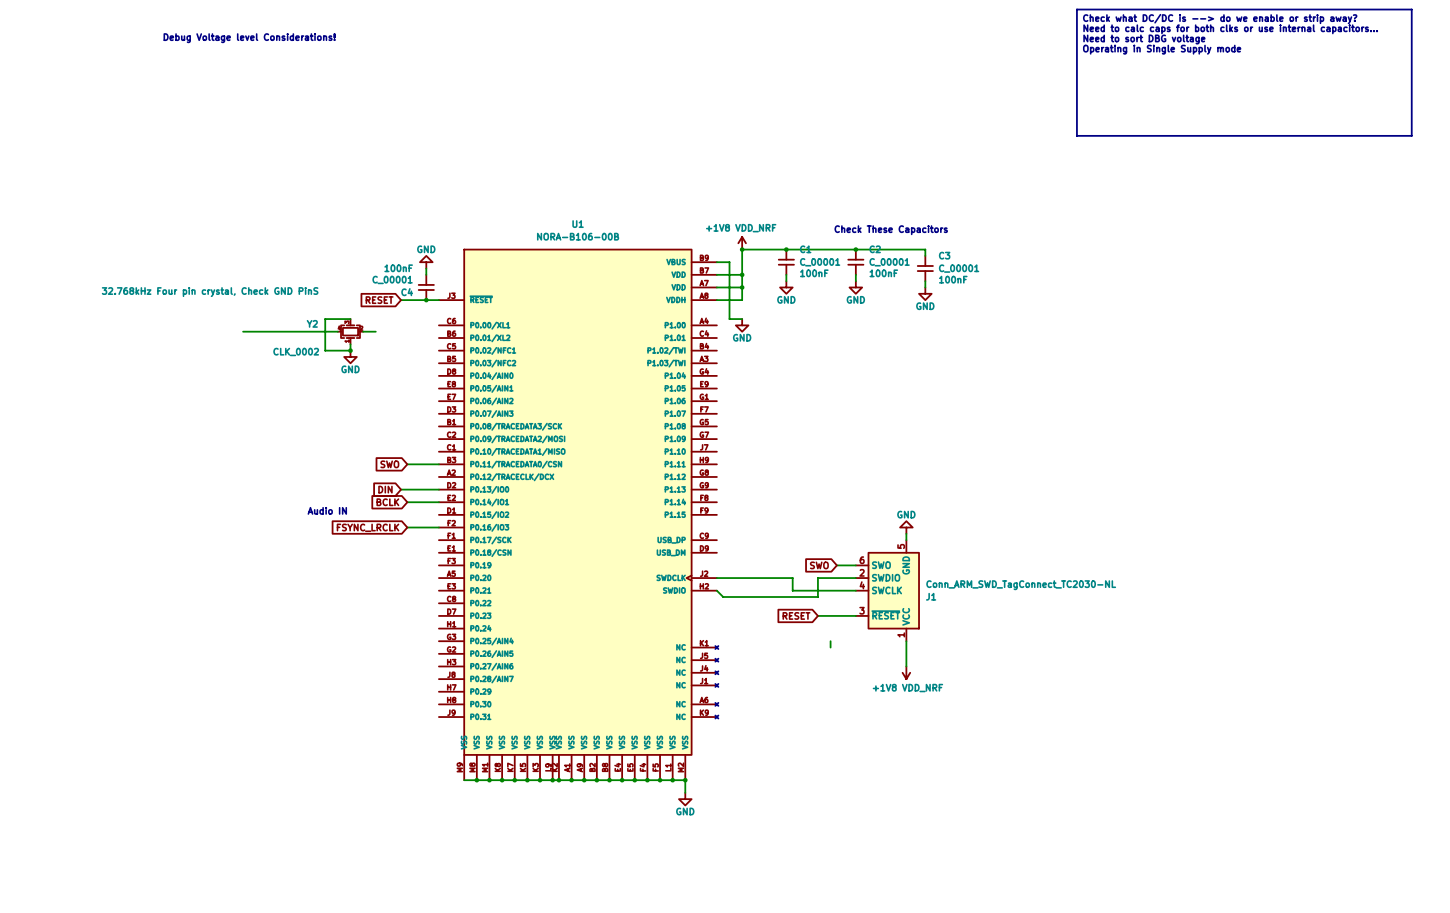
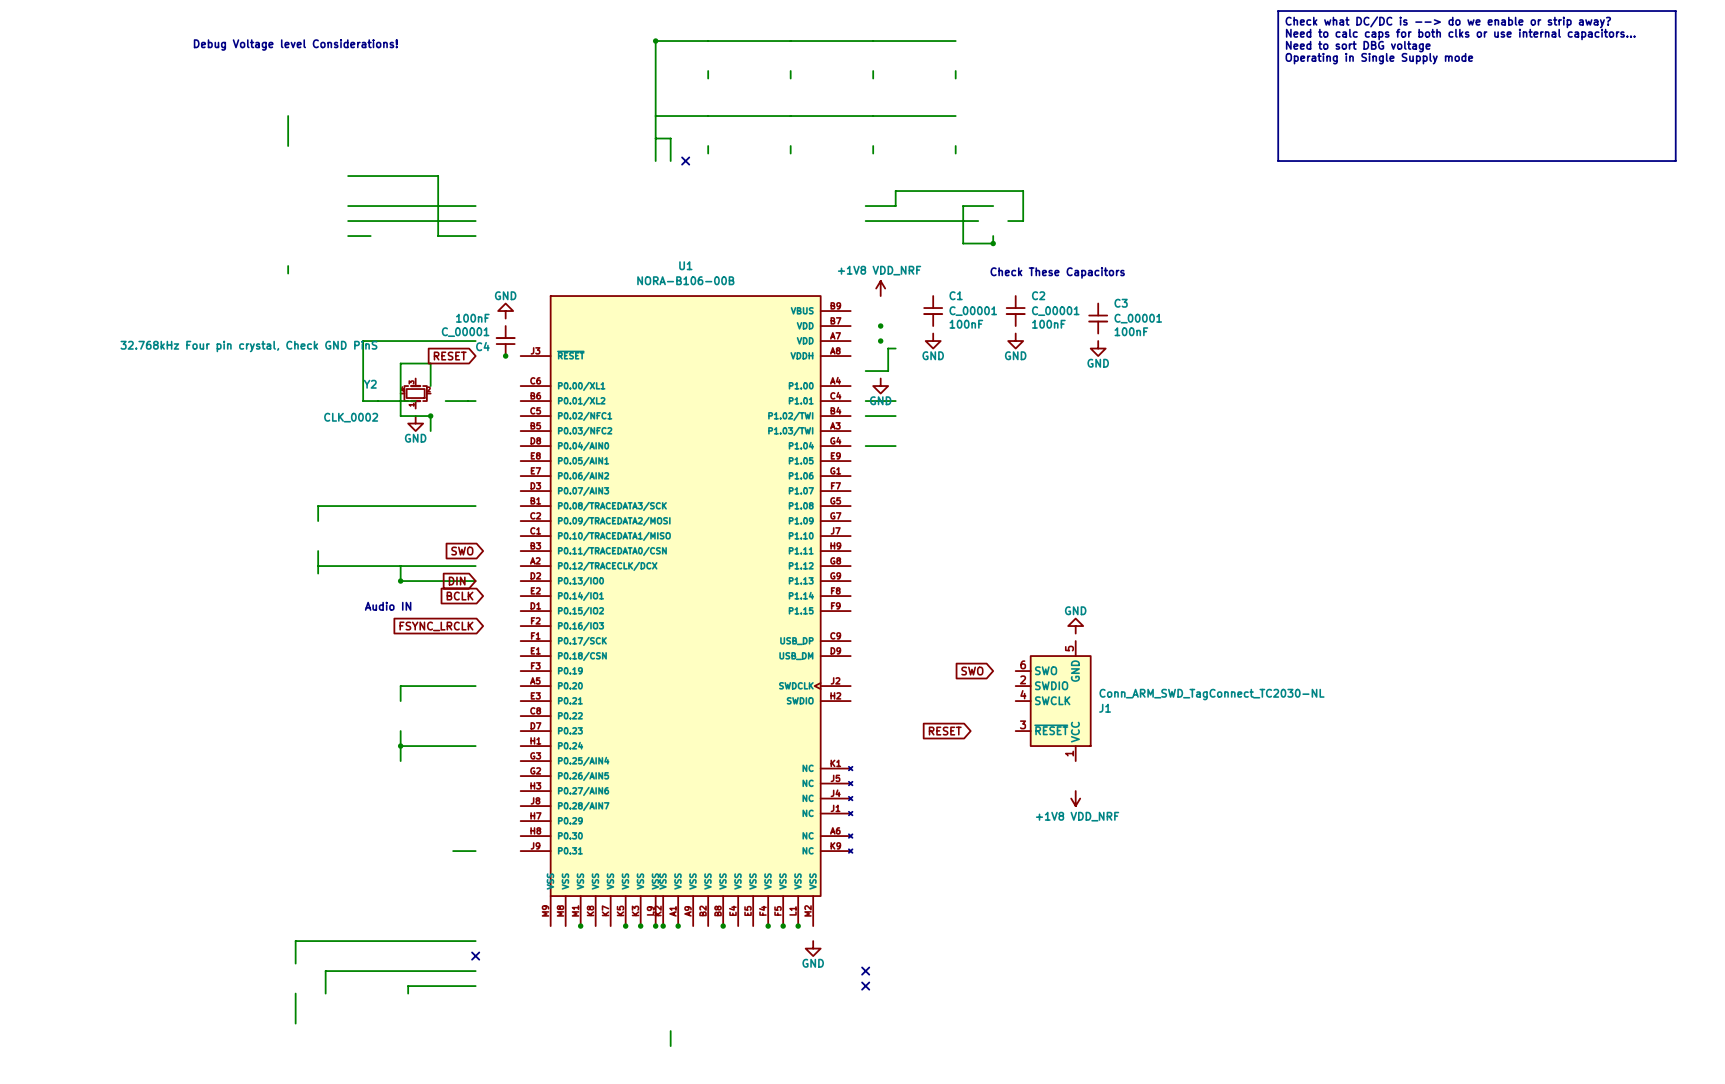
junction: none -> (655, 41)
wire: none -> (955, 41) (655, 41) (655, 161)
wire: none -> (708, 71) (708, 78)
wire: none -> (790, 71) (790, 78)
wire: none -> (873, 71) (873, 78)
wire: none -> (955, 71) (955, 78)
wire: none -> (288, 116) (288, 146)
wire: none -> (655, 116) (955, 116)
wire: none -> (655, 138) (670, 138) (670, 161)
wire: none -> (708, 146) (708, 153)
wire: none -> (790, 146) (790, 153)
wire: none -> (873, 146) (873, 153)
wire: none -> (955, 146) (955, 153)
no-connect mark: none -> (685, 161)
wire: none -> (348, 176) (438, 176) (438, 236) (475, 236)
wire: none -> (348, 206) (475, 206)
wire: none -> (865, 206) (895, 206) (895, 191) (1023, 191) (1023, 221) (1008, 221)
wire: none -> (993, 206) (963, 206) (963, 243) (993, 243) (993, 236)
wire: none -> (348, 221) (475, 221)
wire: none -> (865, 221) (978, 221)
wire: none -> (348, 236) (370, 236)
junction: none -> (993, 243)
wire: none -> (288, 266) (288, 273)
junction: (742, 249) -> none
junction: (786, 249) -> none
junction: (855, 249) -> none
wire: (925, 255) (925, 249) (742, 249) (742, 300) (716, 300) -> none
wire: (716, 262) (729, 262) (729, 319) (742, 319) -> none
wire: (426, 268) (426, 274) -> none
wire: (716, 274) (742, 274) -> (865, 401) (895, 401)
wire: (786, 274) (786, 281) -> none
wire: (855, 274) (855, 281) -> none
wire: (925, 281) (925, 287) -> none
wire: none -> (475, 341) (363, 341) (363, 401) (415, 401)
wire: (716, 287) (742, 287) -> (865, 416) (895, 416)
wire: none -> (895, 348) (888, 348) (888, 371) (865, 371)
wire: (401, 300) (438, 300) -> none
wire: (350, 319) (325, 319) (325, 350) (337, 350) -> (430, 386) (430, 363) (400, 363) (400, 416)
wire: (243, 331) (337, 331) -> none
wire: (363, 331) (375, 331) -> none
wire: none -> (445, 401) (475, 401)
wire: (350, 344) (350, 350) -> (430, 431) (430, 416) (415, 416)
junction position: (350, 350) -> (430, 416)
wire: none -> (865, 446) (895, 446)
wire: none -> (475, 506) (318, 506) (318, 521)
wire: none -> (318, 551) (318, 573)
wire: (407, 464) (438, 464) -> none
wire: none -> (318, 566) (475, 566)
junction: none -> (400, 581)
wire: (401, 489) (438, 489) -> (475, 581) (400, 581) (400, 566)
wire: (407, 502) (438, 502) -> none
wire: (407, 527) (438, 527) -> none
wire: (906, 533) (906, 540) -> none
wire: (836, 565) (855, 565) -> none
wire: none -> (475, 686) (400, 686) (400, 701)
wire: (716, 578) (792, 578) (792, 590) (855, 590) -> none
wire: (855, 578) (817, 578) (817, 597) (723, 597) (716, 590) -> none
wire: none -> (400, 731) (400, 761)
wire: (817, 615) (855, 615) -> none
wire: none -> (400, 746) (475, 746)
junction: none -> (400, 746)
wire: (830, 641) (830, 647) -> none
wire: (906, 641) (906, 666) -> none
wire: none -> (453, 851) (475, 851)
wire: (464, 780) (685, 780) (685, 792) -> none
junction: (476, 780) -> none
junction: (502, 780) -> none
junction: (514, 780) -> none
junction: (584, 780) -> none
junction: (596, 780) -> none
junction: (622, 780) -> none
junction: (634, 780) -> none
junction: (685, 780) -> none
wire: none -> (475, 941) (295, 941) (295, 963)
no-connect mark: none -> (475, 956)
wire: none -> (475, 971) (325, 971) (325, 993)
no-connect mark: none -> (865, 971)
wire: none -> (475, 986) (408, 986) (408, 993)
no-connect mark: none -> (865, 986)
wire: none -> (295, 993) (295, 1023)
wire: none -> (670, 1031) (670, 1046)

